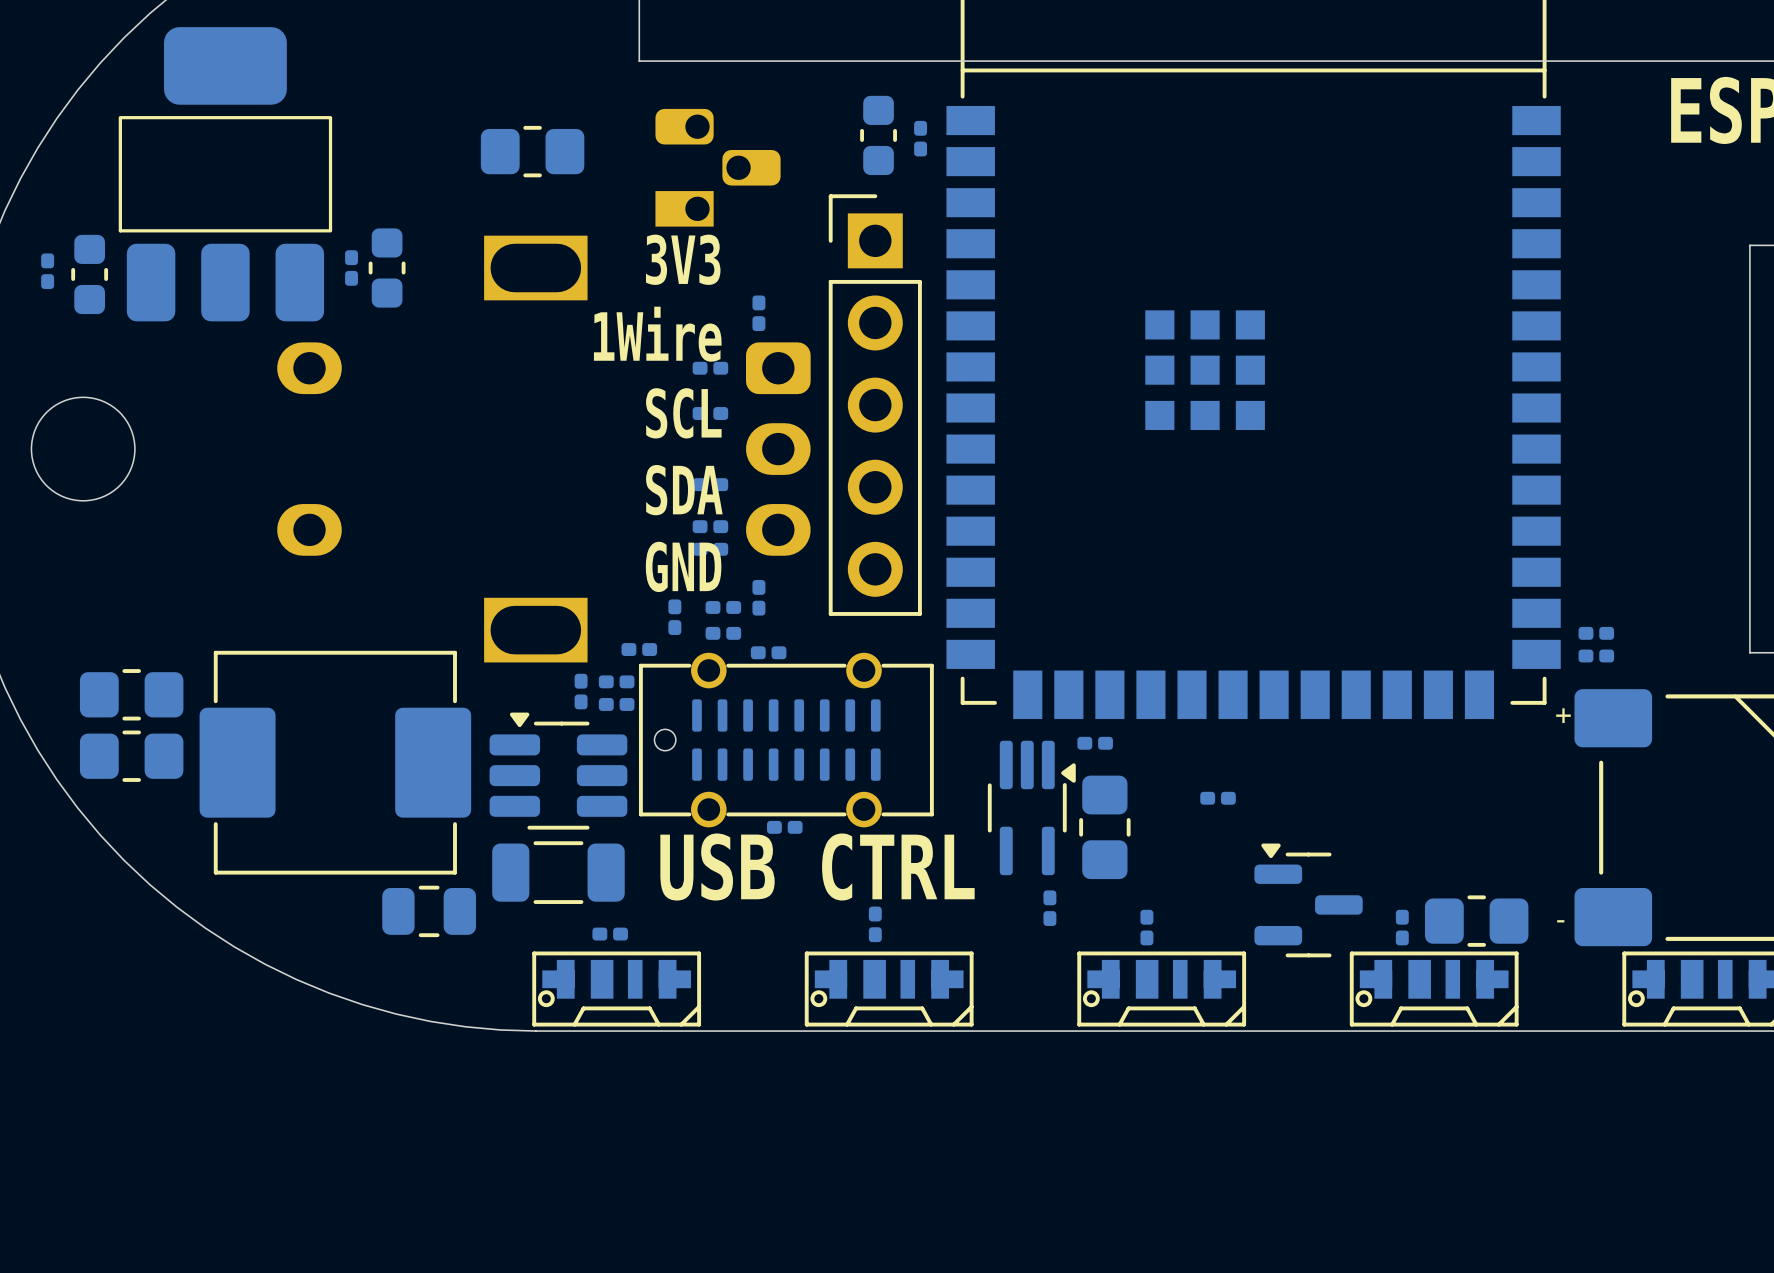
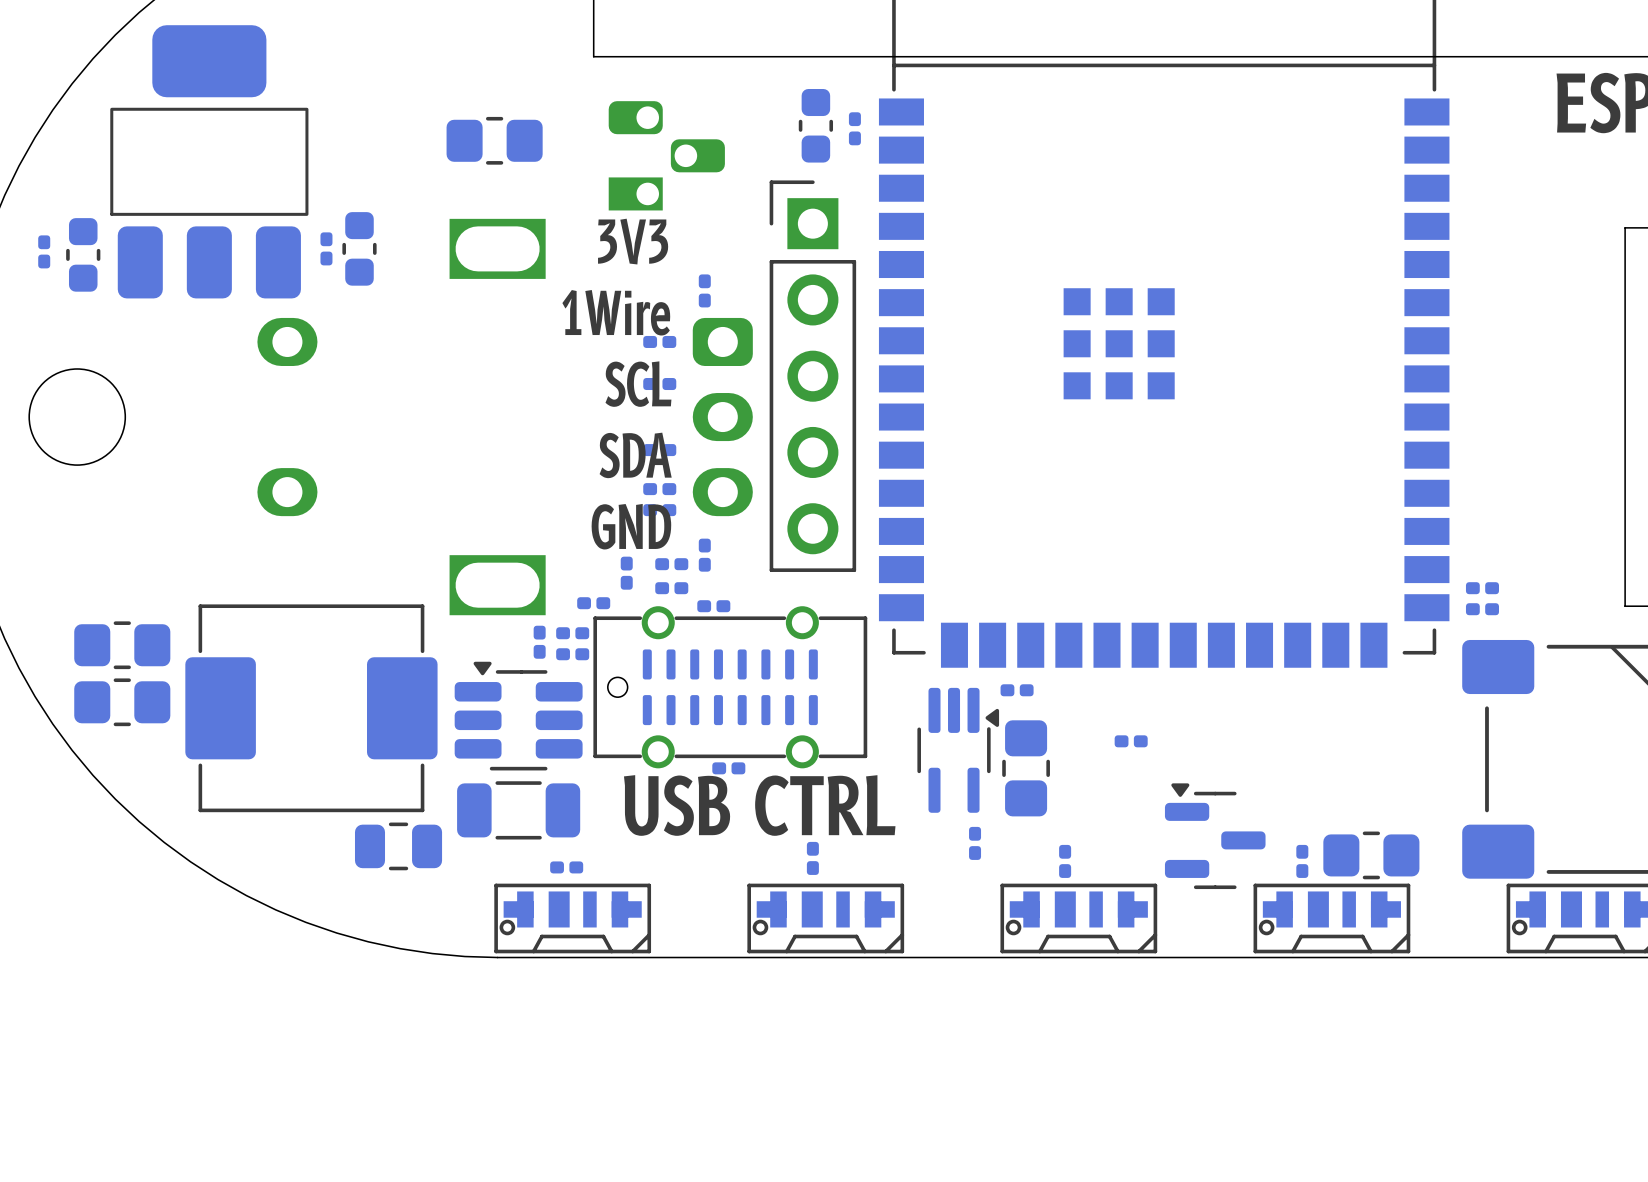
part text: + (1563, 715) -> none
part text: - (1560, 921) -> none

